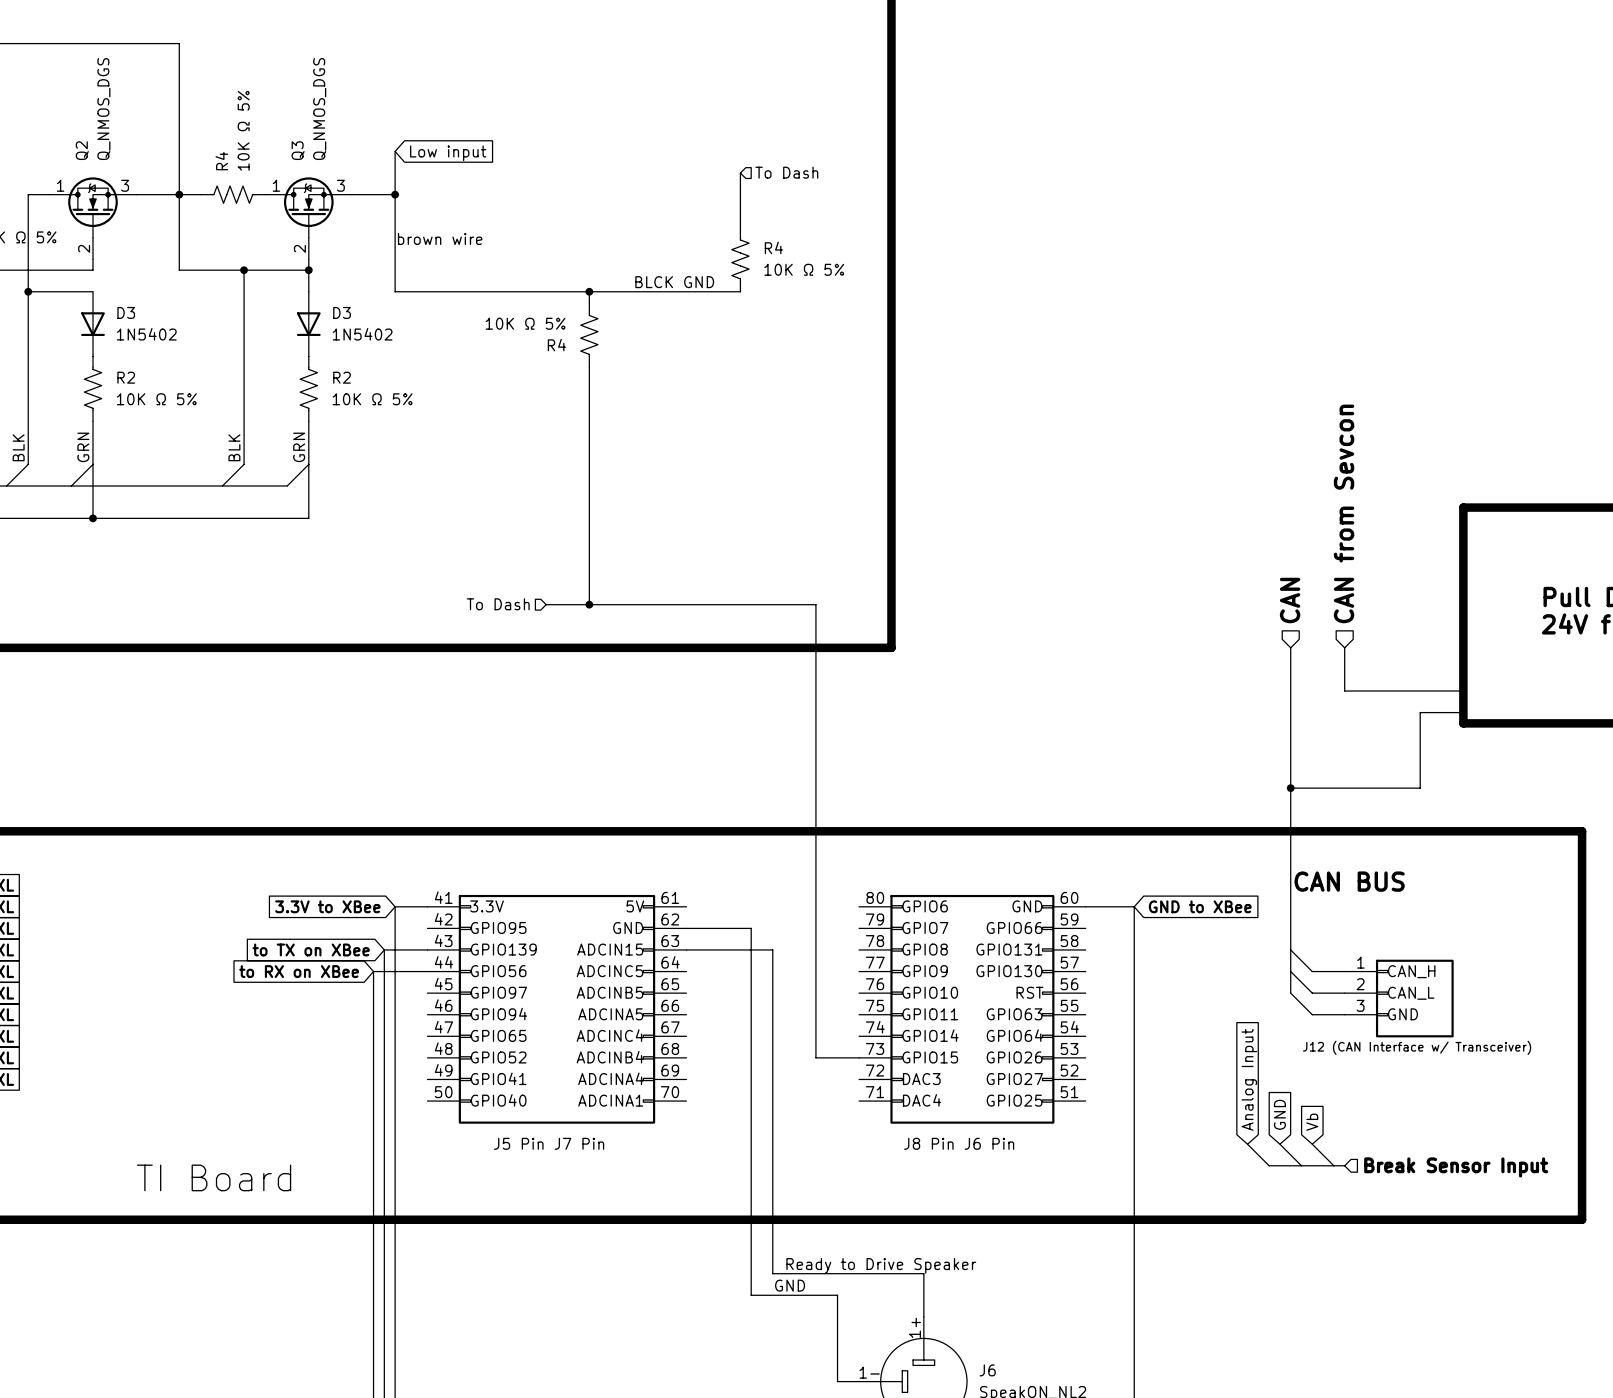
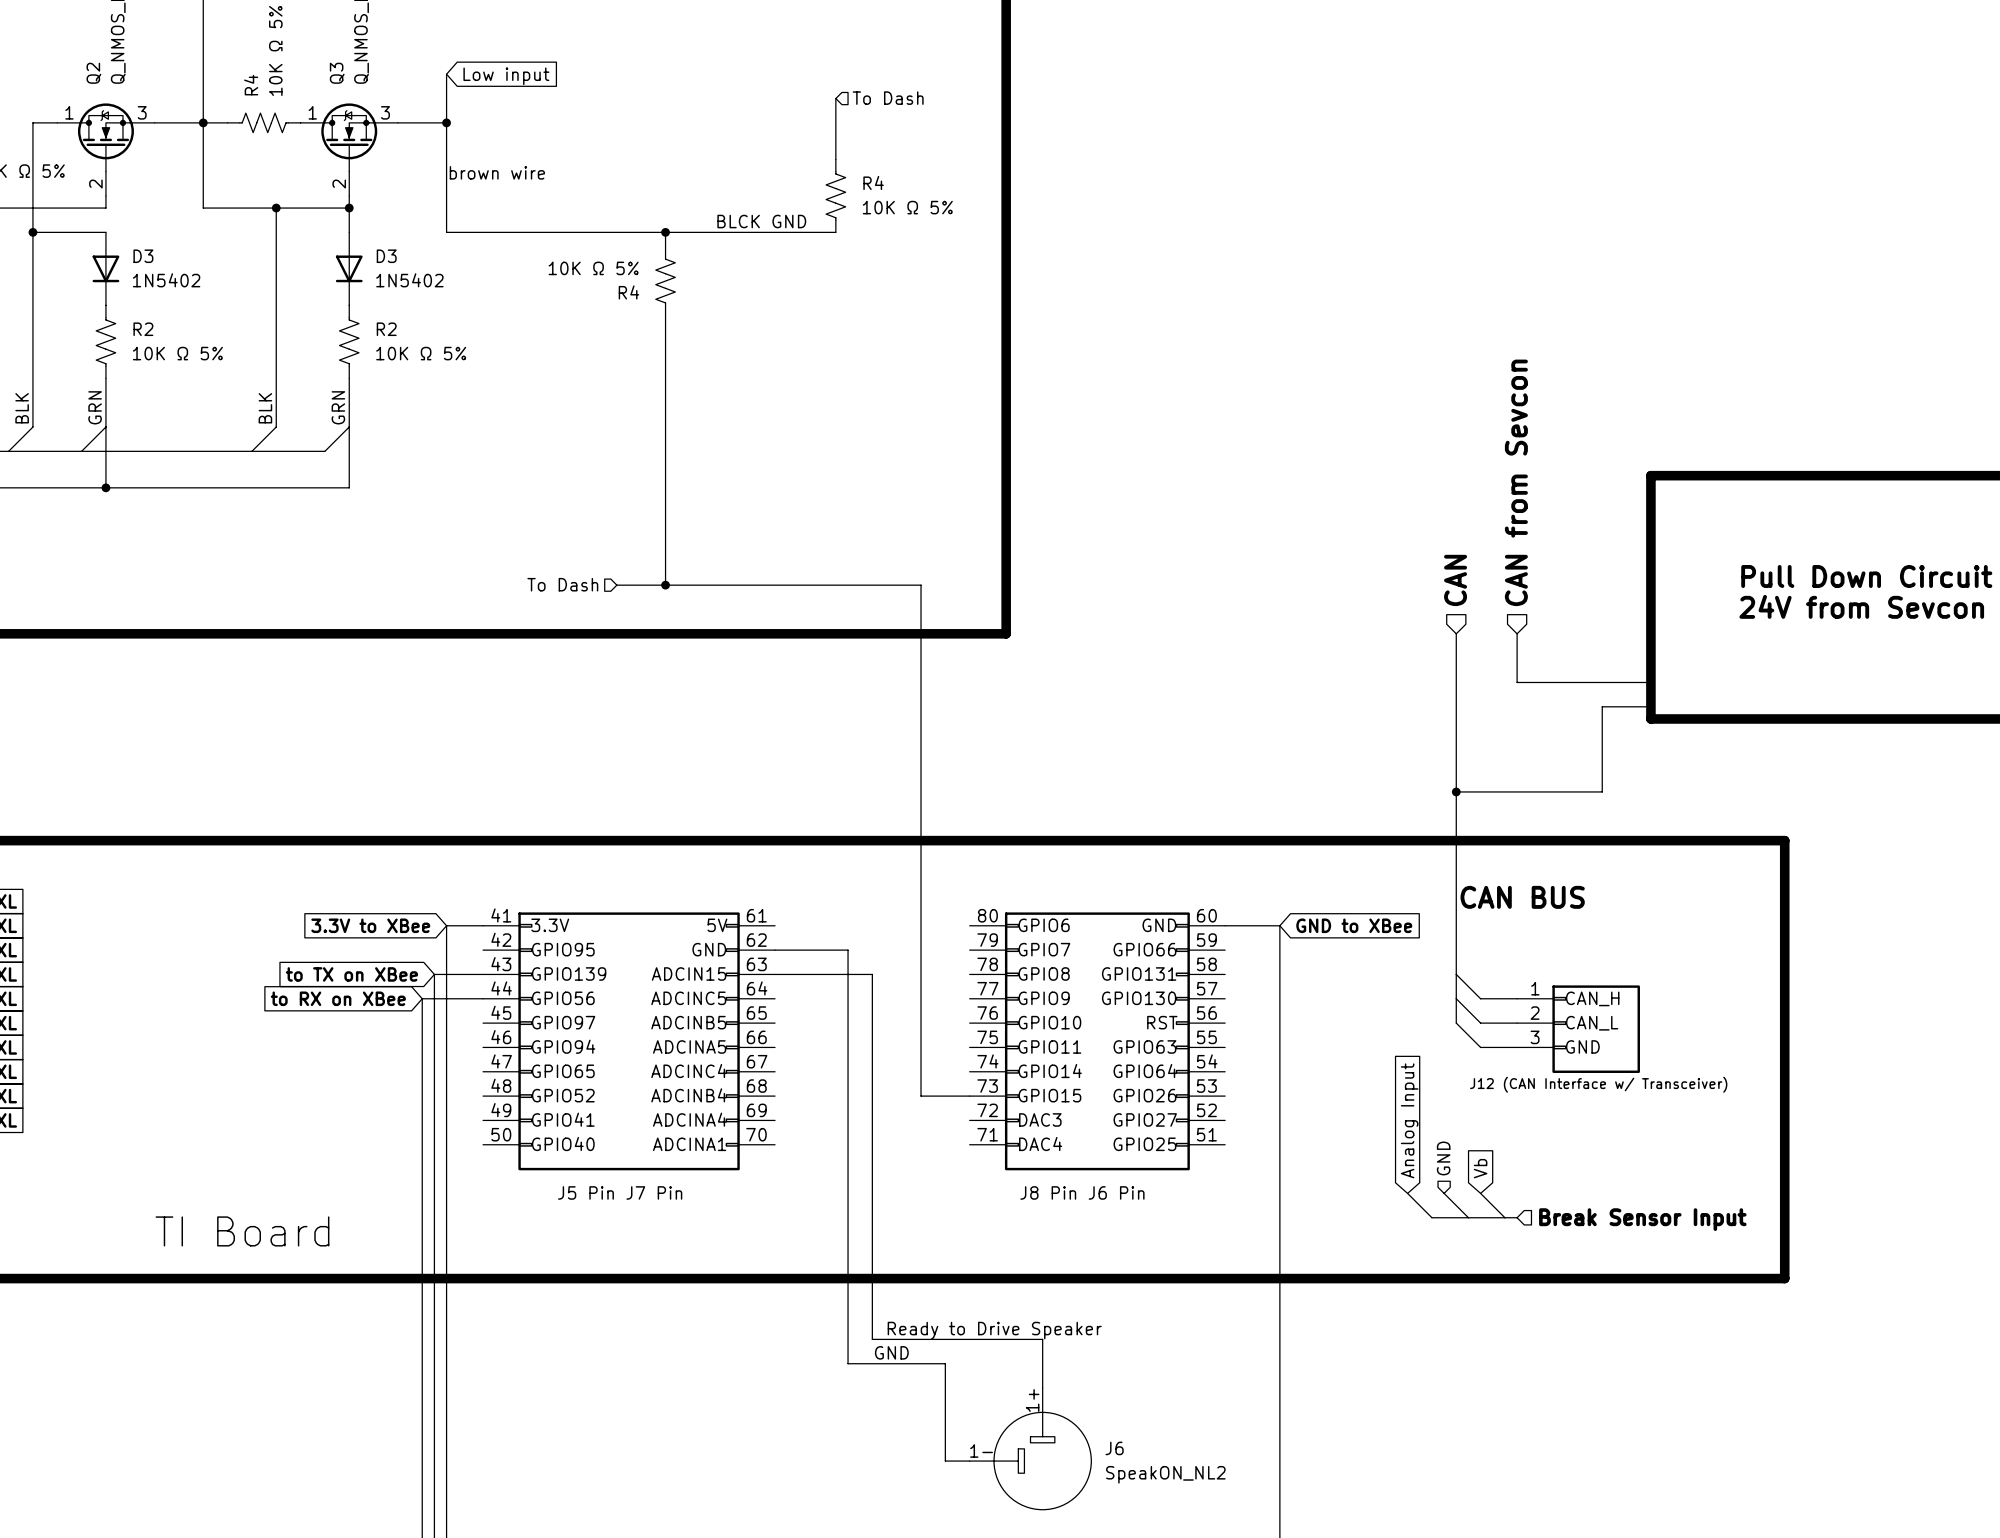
hierarchical label: none -> GND (1443, 1158)
global label: GND (1279, 1114) -> none

